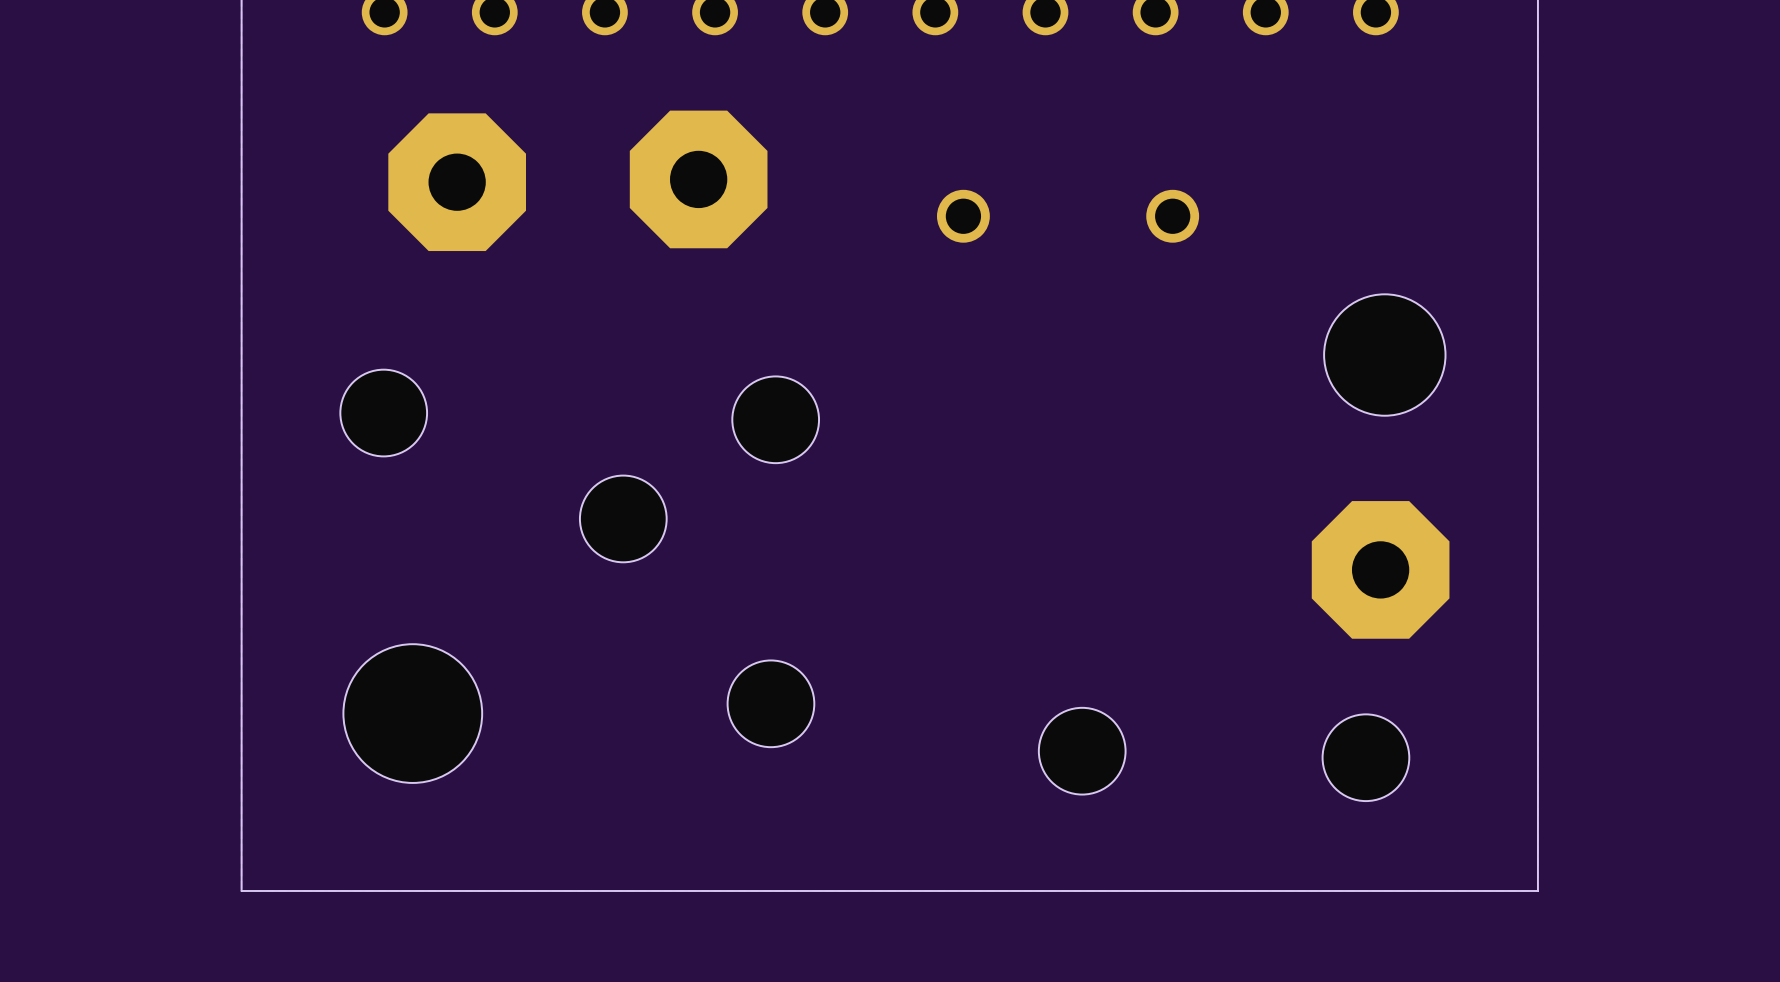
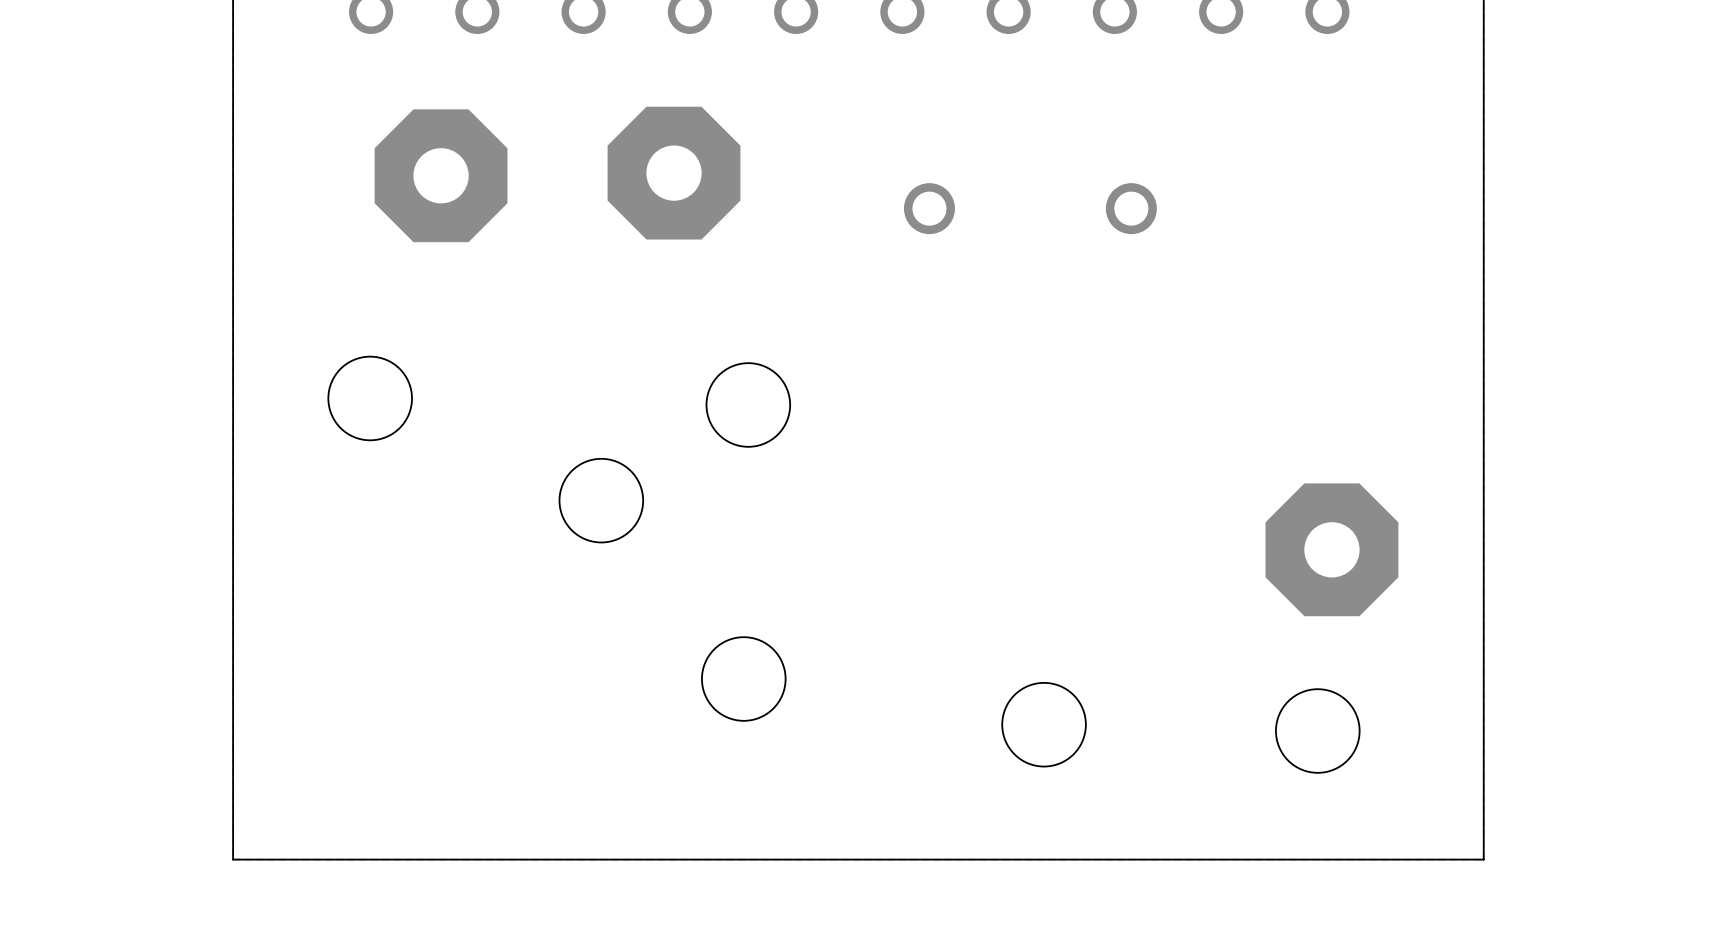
hole: (1384, 355) -> none
hole: (412, 713) -> none

